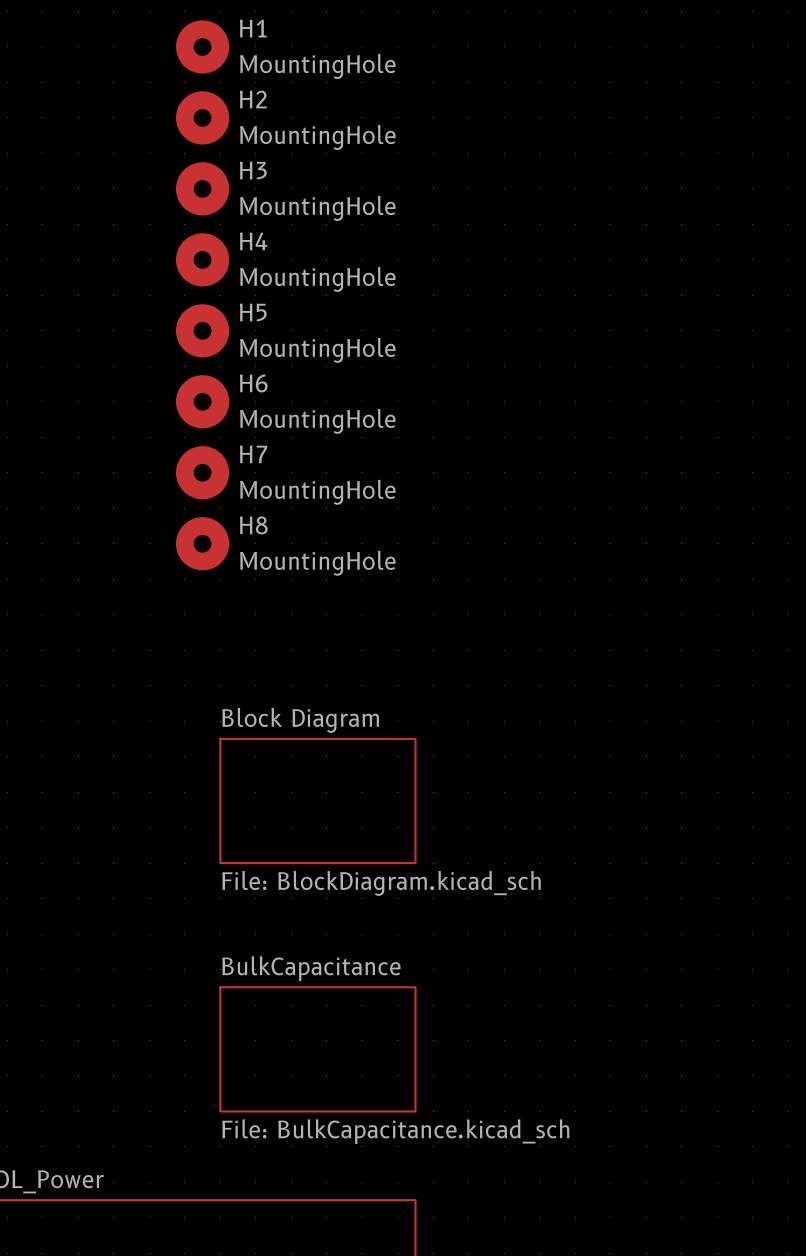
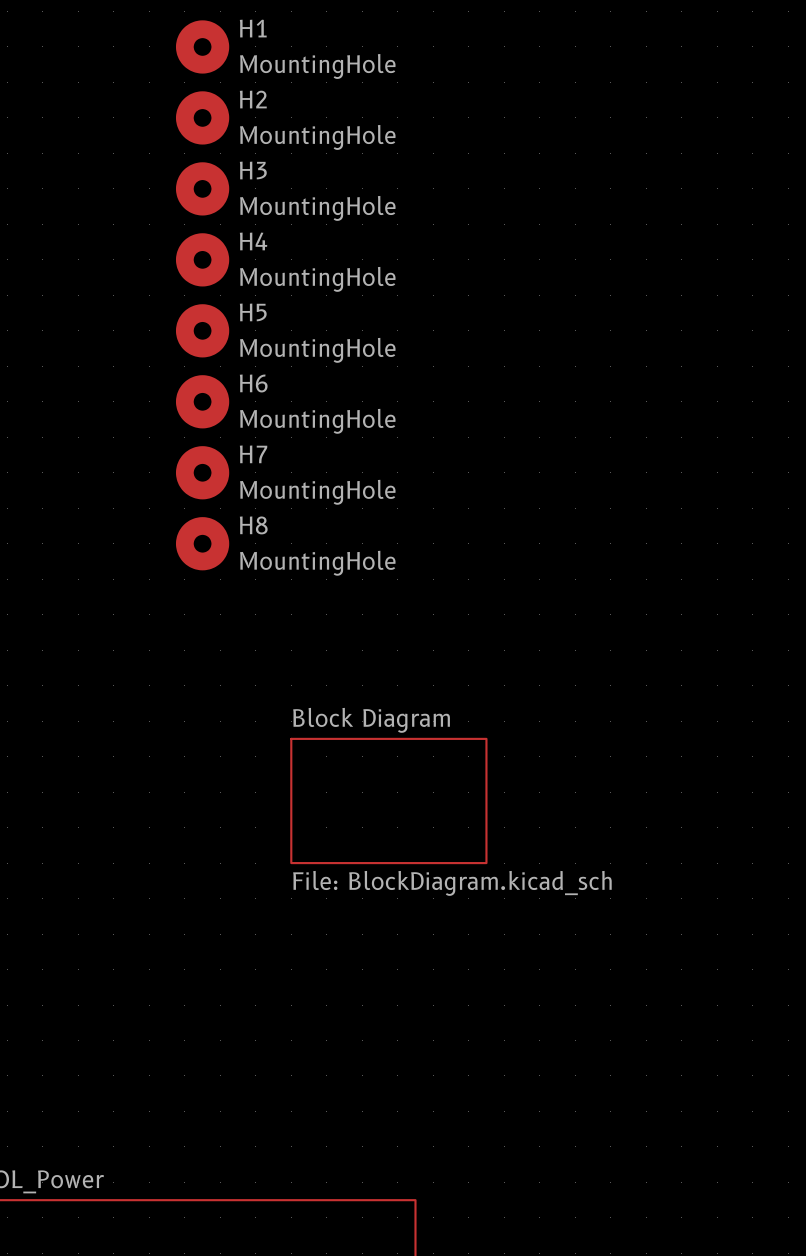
sheet Block Diagram position: (317, 800) -> (388, 800)
sheet BulkCapacitance: File: BulkCapacitance.kicad_sch (317, 1049) -> none

